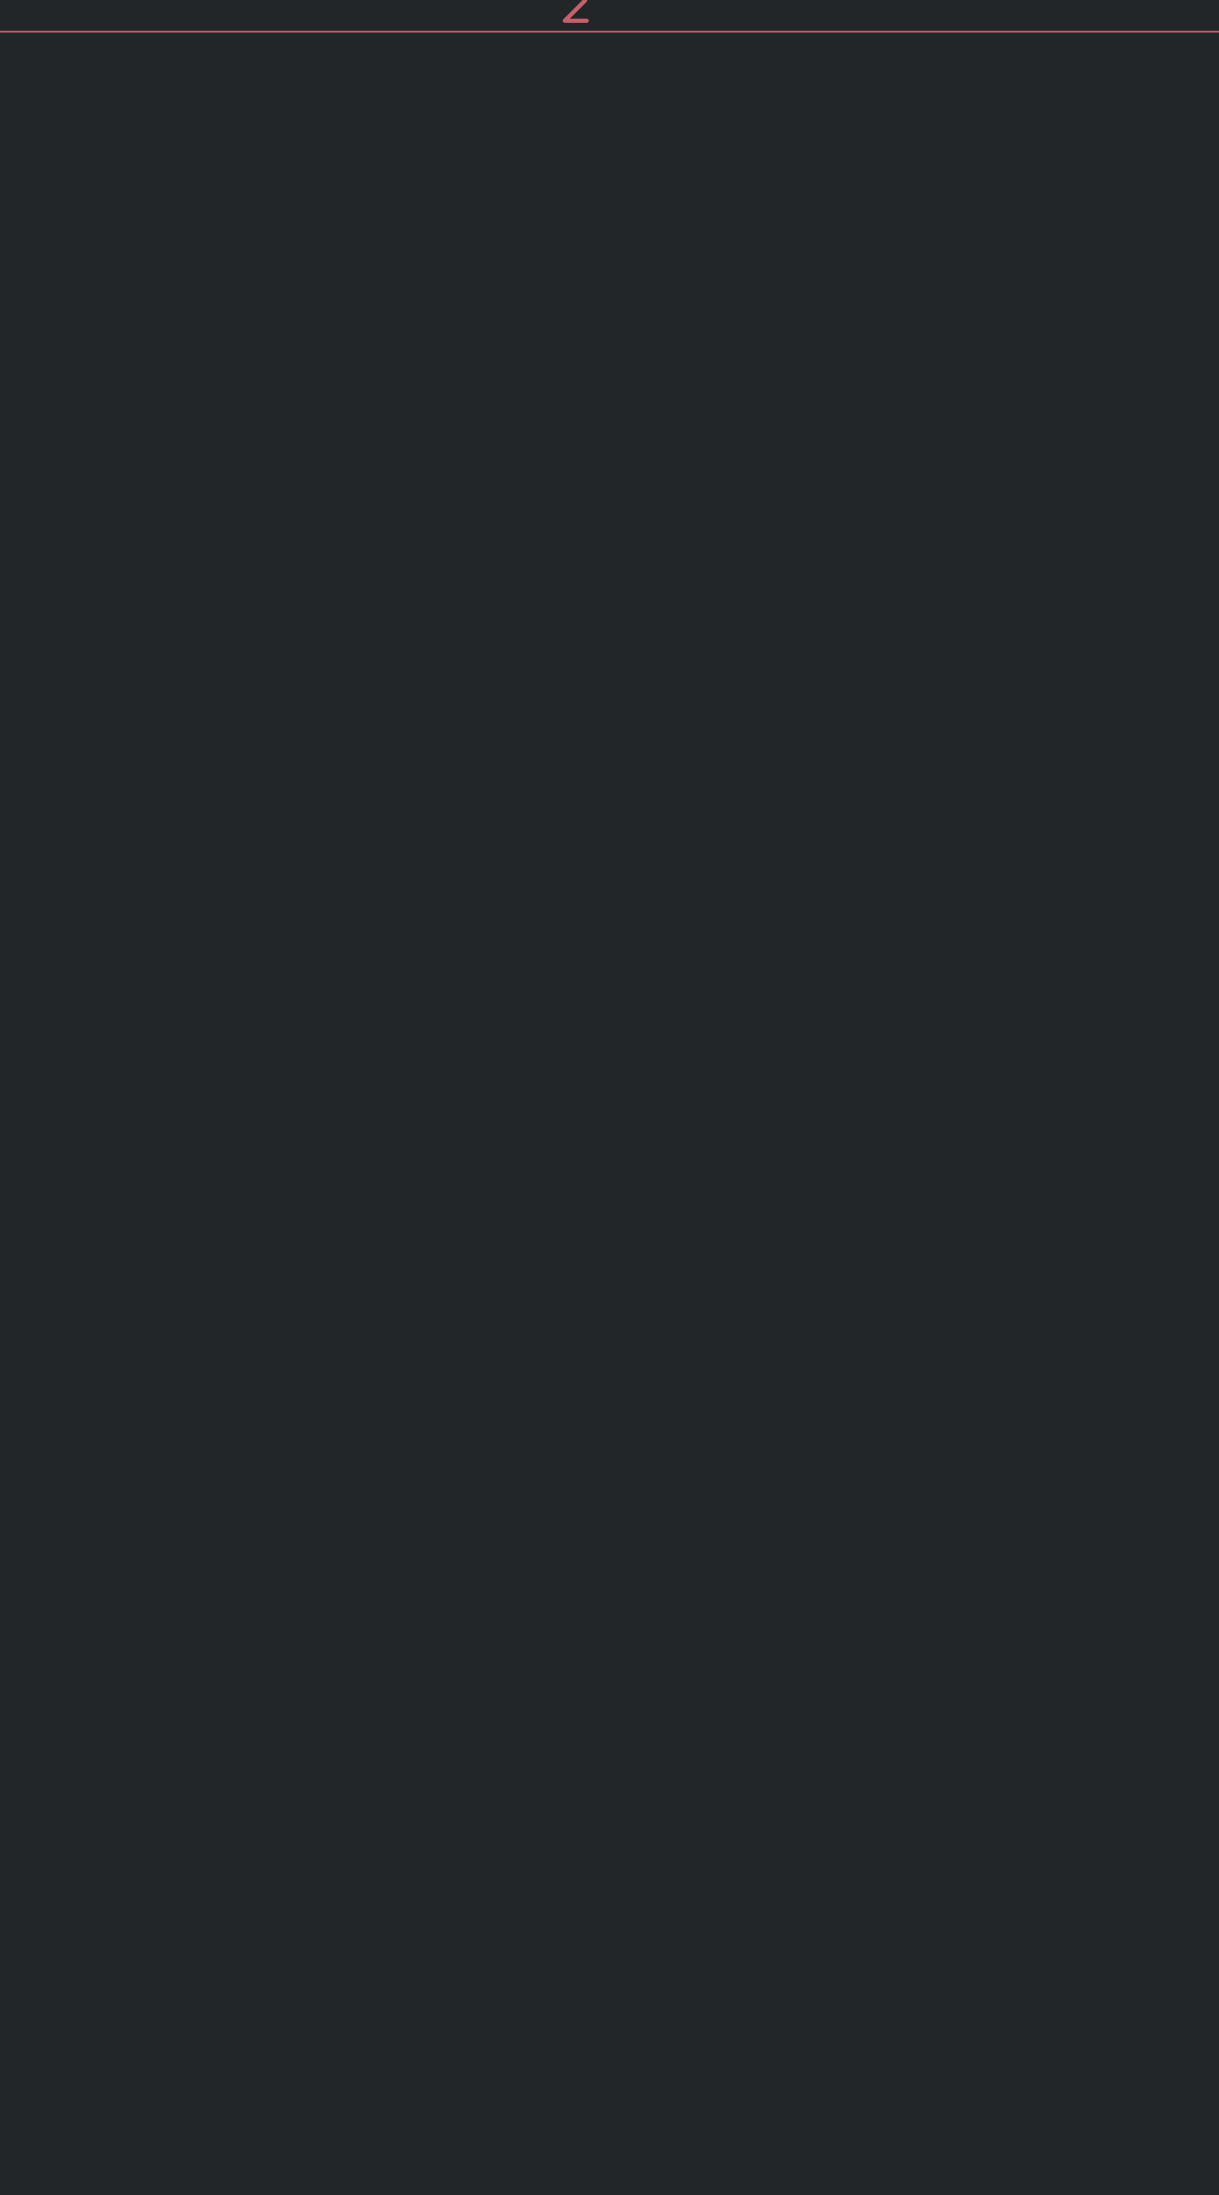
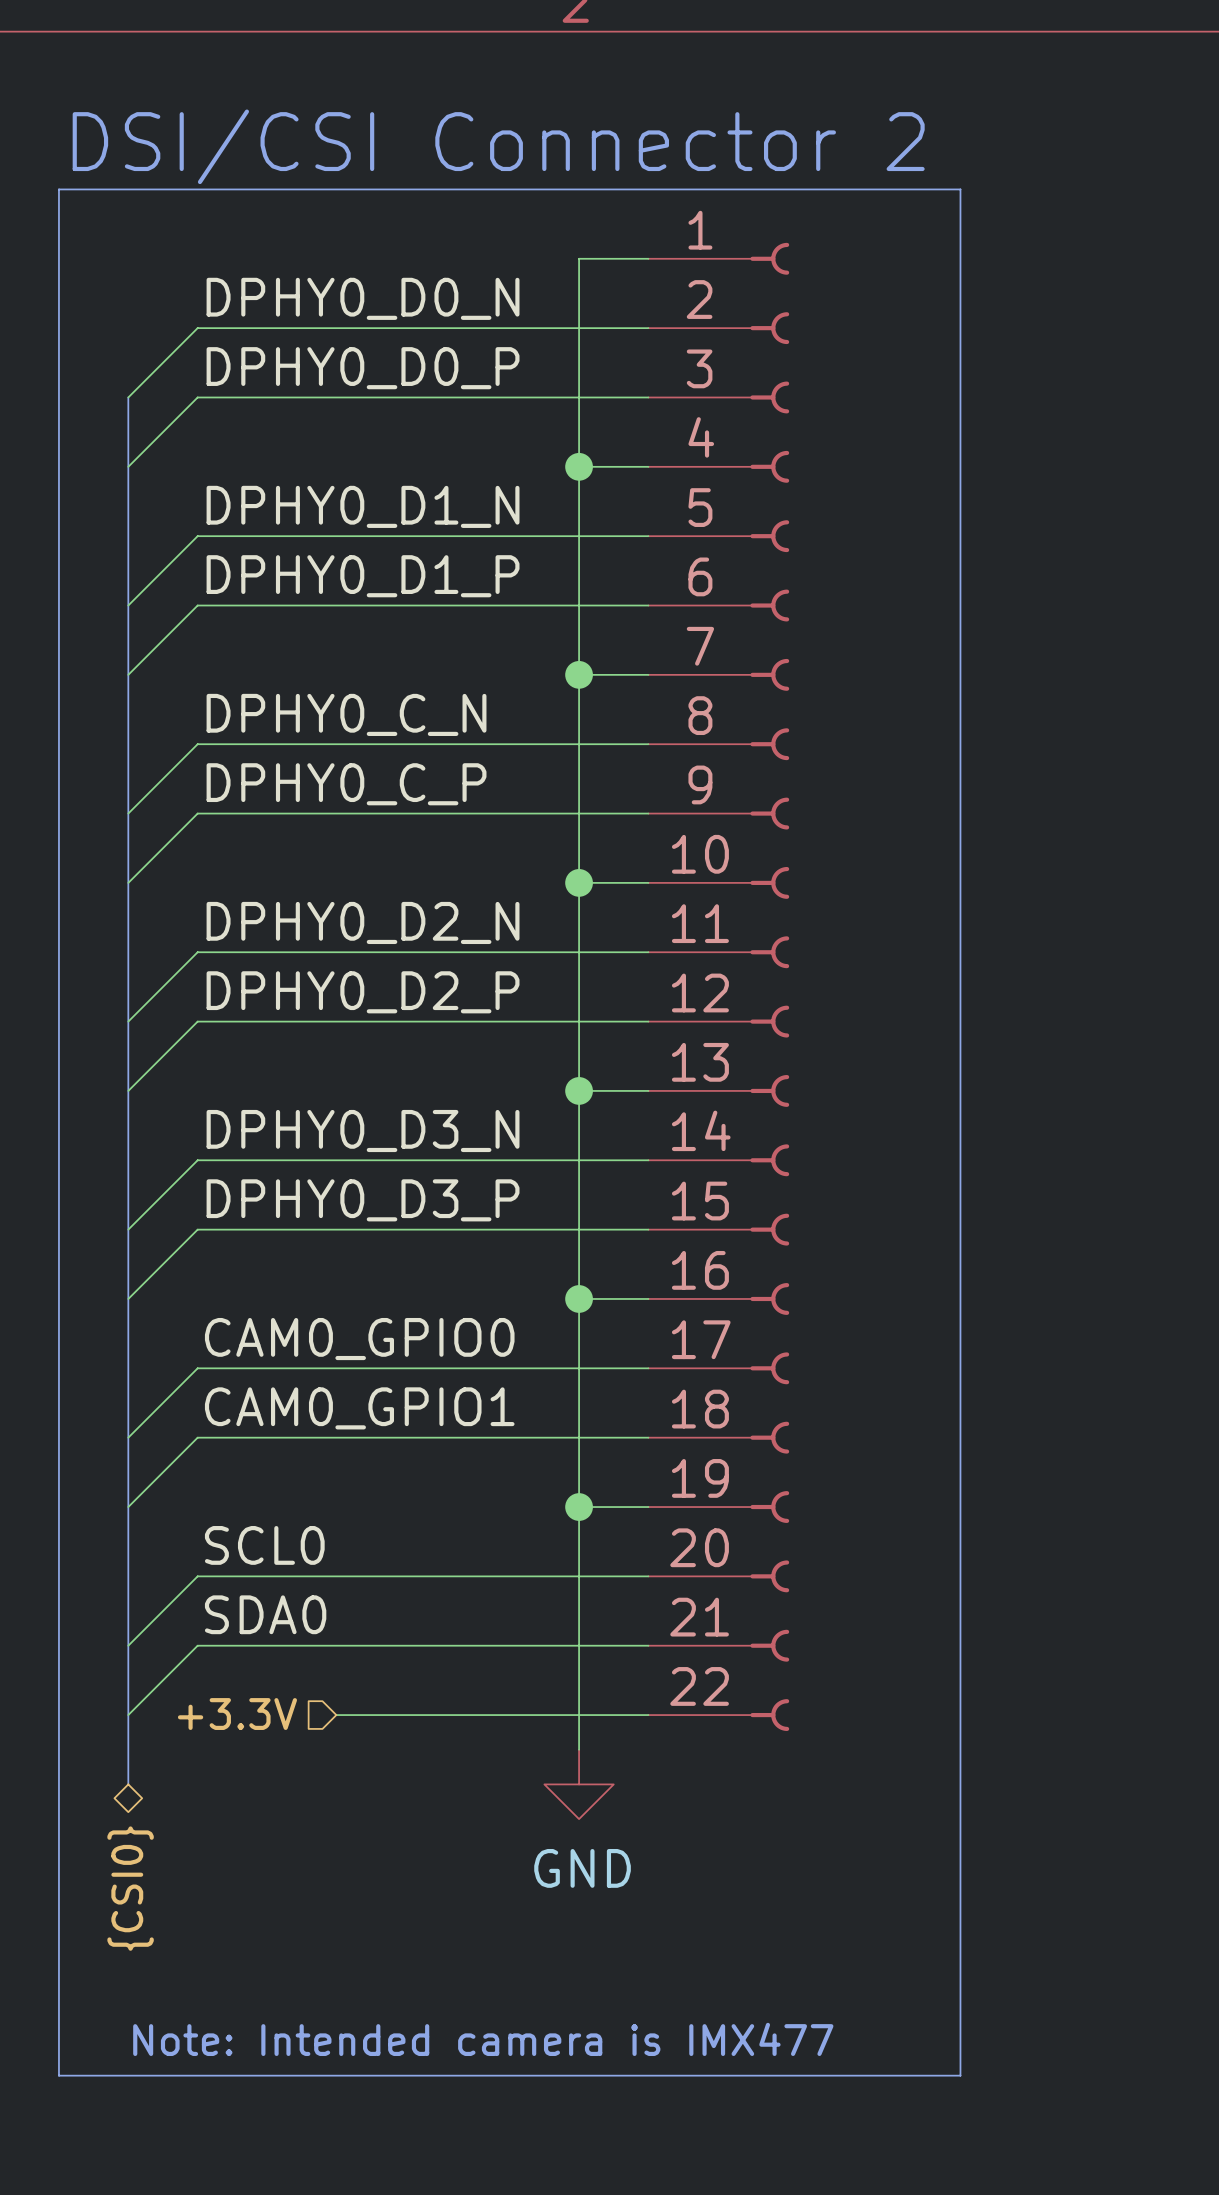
text: none -> DSI/CSI Connector 2 (498, 146)
line: none -> (58, 189) (960, 189) (960, 2075) (58, 2075) (58, 189)
wire: none -> (648, 258) (579, 258) (579, 1749)
label: none -> DPHY0_D0_N (363, 298)
wire: none -> (648, 328) (197, 328) (128, 397)
label: none -> DPHY0_D0_P (363, 368)
bus: none -> (128, 397) (128, 1784)
wire: none -> (648, 397) (197, 397) (128, 466)
wire: none -> (579, 466) (648, 466)
junction: none -> (579, 466)
label: none -> DPHY0_D1_N (363, 506)
wire: none -> (648, 536) (197, 536) (128, 605)
label: none -> DPHY0_D1_P (363, 576)
wire: none -> (648, 605) (197, 605) (128, 674)
wire: none -> (579, 674) (648, 674)
junction: none -> (579, 674)
label: none -> DPHY0_C_N (346, 714)
wire: none -> (648, 744) (197, 744) (128, 813)
label: none -> DPHY0_C_P (346, 784)
wire: none -> (648, 813) (197, 813) (128, 882)
wire: none -> (579, 882) (648, 882)
junction: none -> (579, 882)
label: none -> DPHY0_D2_N (363, 922)
wire: none -> (648, 952) (197, 952) (128, 1021)
part: none -> (718, 986)
label: none -> DPHY0_D2_P (363, 992)
wire: none -> (648, 1021) (197, 1021) (128, 1090)
wire: none -> (579, 1090) (648, 1090)
junction: none -> (579, 1090)
label: none -> DPHY0_D3_N (363, 1131)
wire: none -> (648, 1160) (197, 1160) (128, 1229)
label: none -> DPHY0_D3_P (363, 1200)
wire: none -> (648, 1229) (197, 1229) (128, 1298)
wire: none -> (579, 1298) (648, 1298)
junction: none -> (579, 1298)
label: none -> CAM0_GPIO0 (359, 1339)
wire: none -> (648, 1368) (197, 1368) (128, 1437)
label: none -> CAM0_GPIO1 (359, 1408)
wire: none -> (648, 1437) (197, 1437) (128, 1507)
wire: none -> (579, 1507) (648, 1507)
junction: none -> (579, 1507)
label: none -> SCL0 (264, 1545)
wire: none -> (648, 1576) (197, 1576) (128, 1645)
label: none -> SDA0 (265, 1614)
wire: none -> (648, 1645) (197, 1645) (128, 1715)
hierarchical label: none -> +3.3V (237, 1714)
wire: none -> (336, 1715) (648, 1715)
power symbol: none -> GND (579, 1784)
hierarchical label: none -> {CSI0} (130, 1888)
text: none -> Note: Intended camera is IMX477 (483, 2039)

